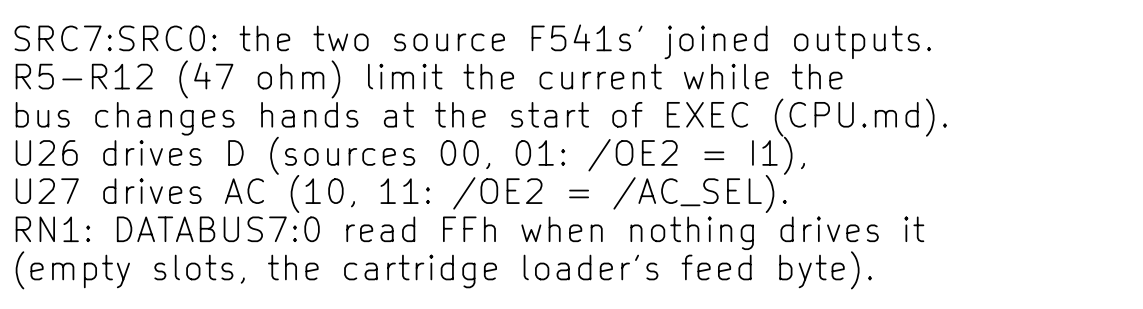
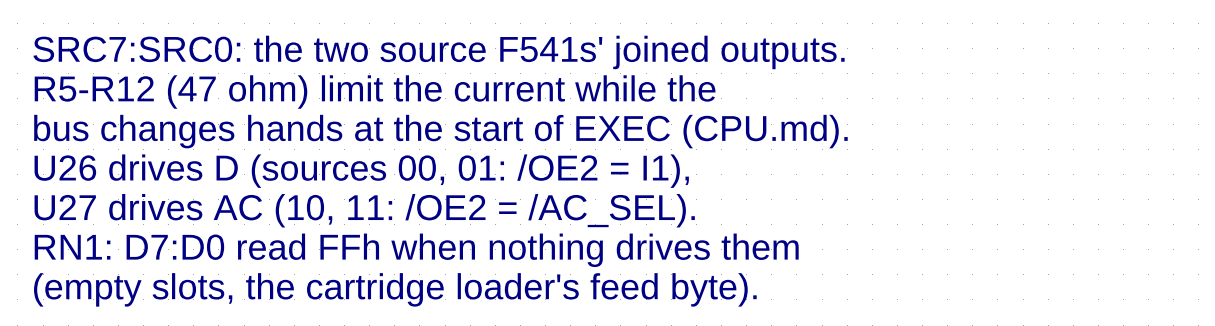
text: RN1: DATABUS7:0 read FFh when nothing drives it (470, 233) -> RN1: D7:D0 read FFh when nothing drives them (416, 250)

